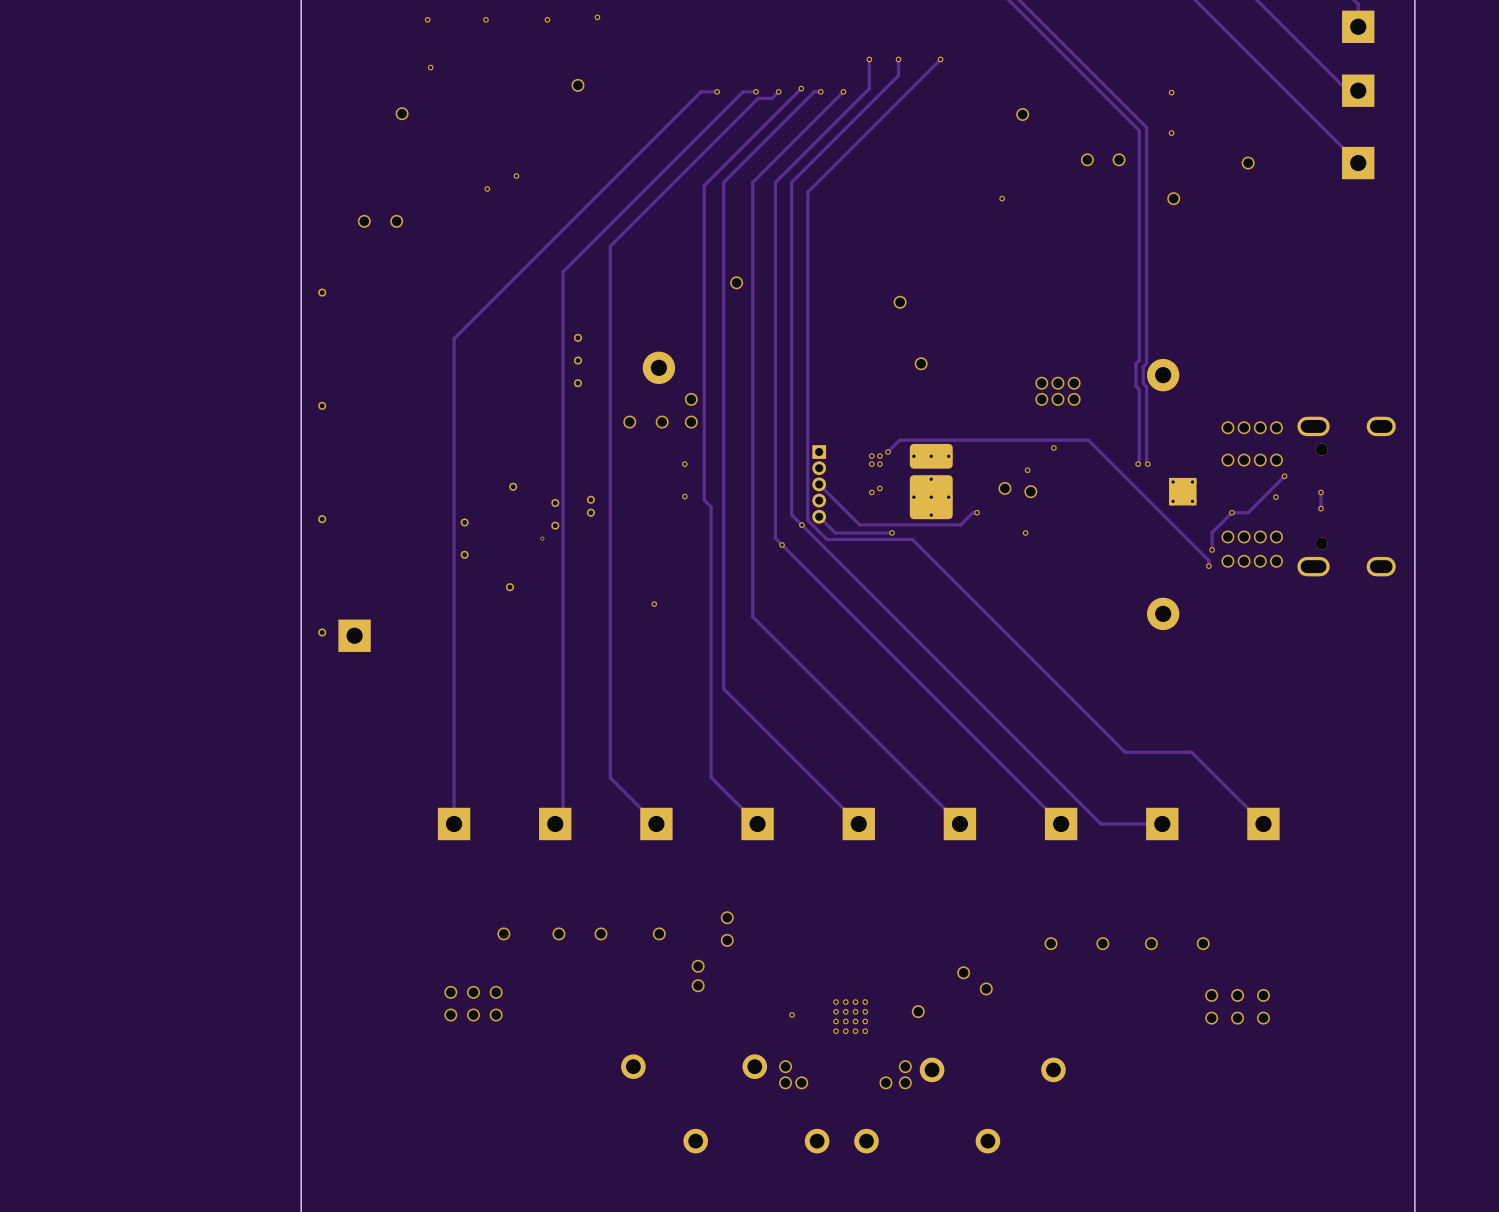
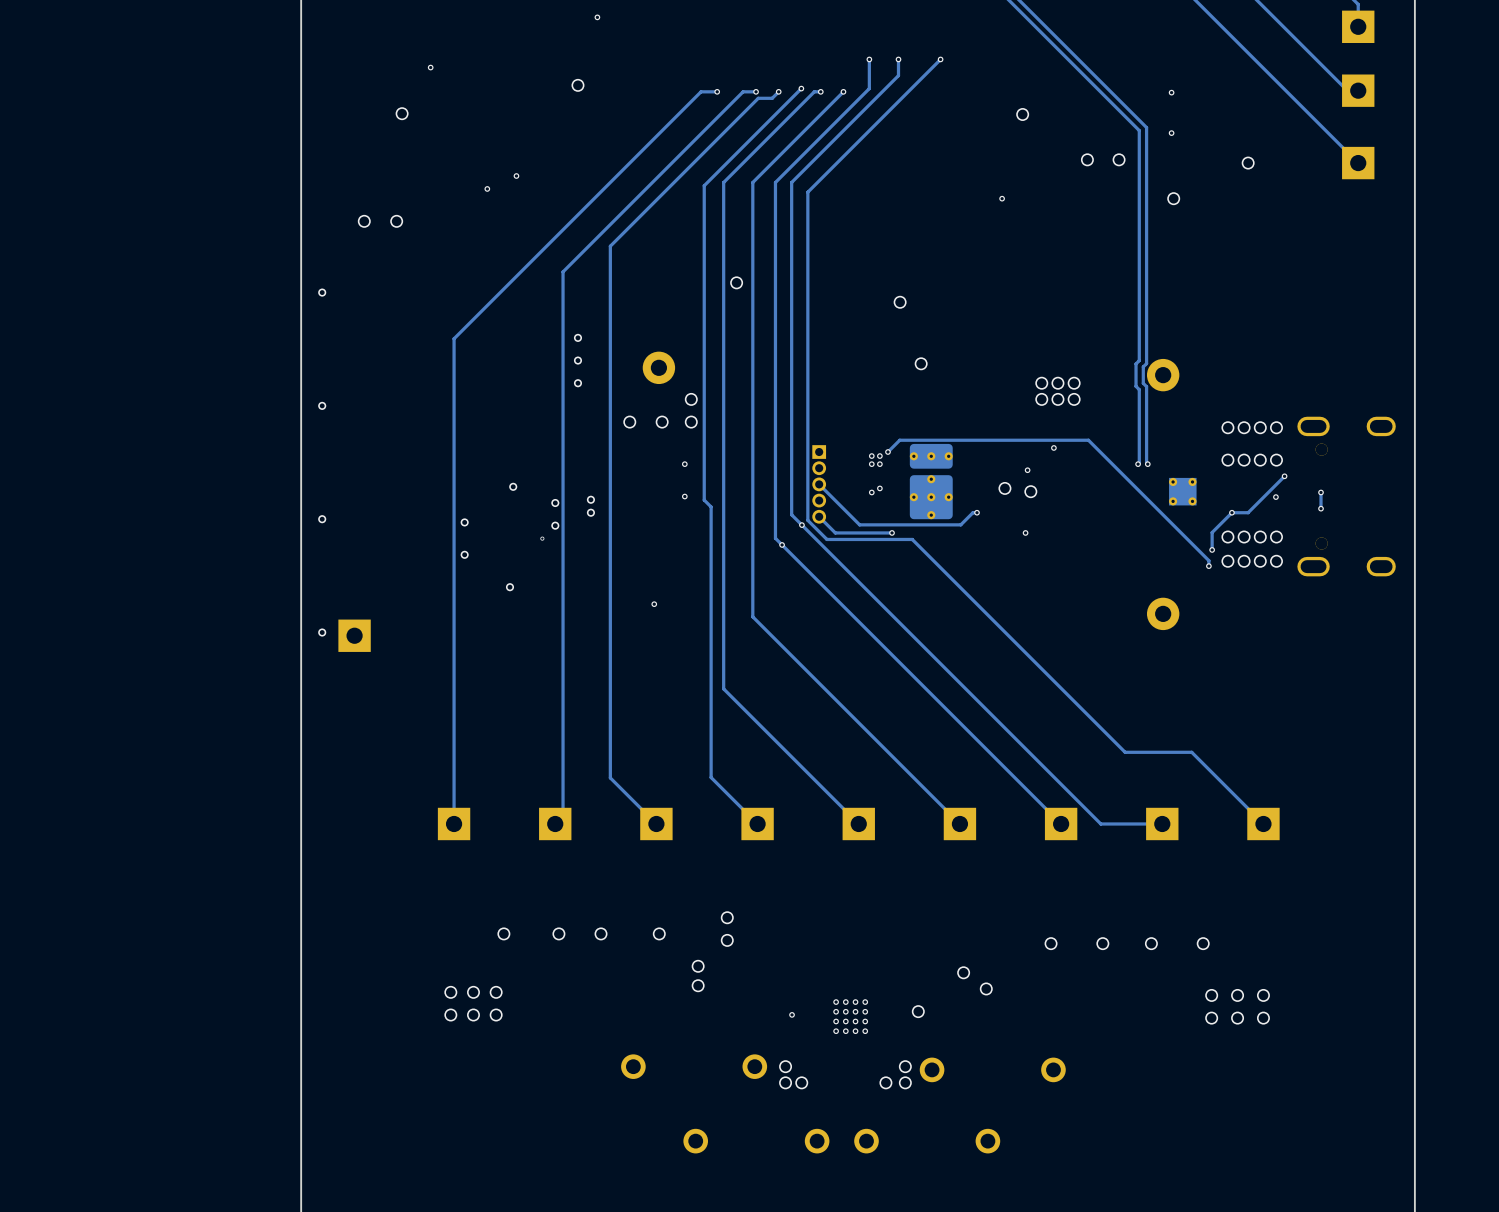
via: (427, 19) -> none
via: (485, 19) -> none
via: (547, 19) -> none

